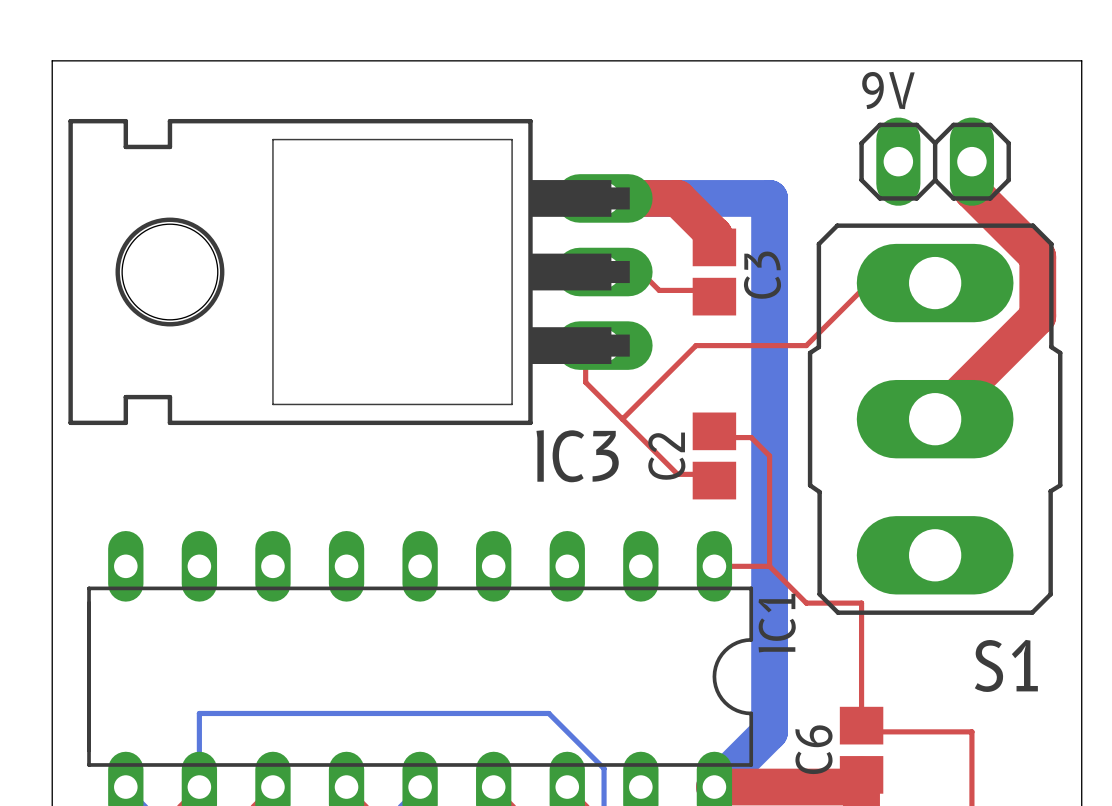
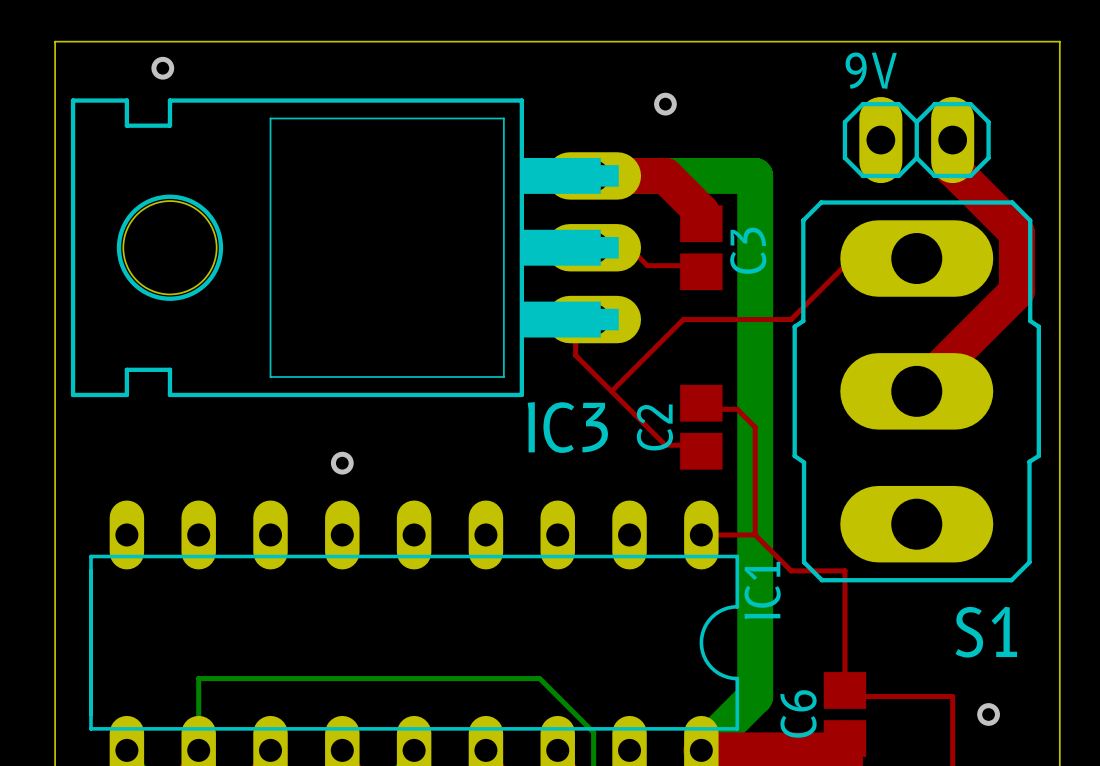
via: none -> (162, 68)
via: none -> (665, 104)
via: none -> (342, 463)
via: none -> (988, 714)

